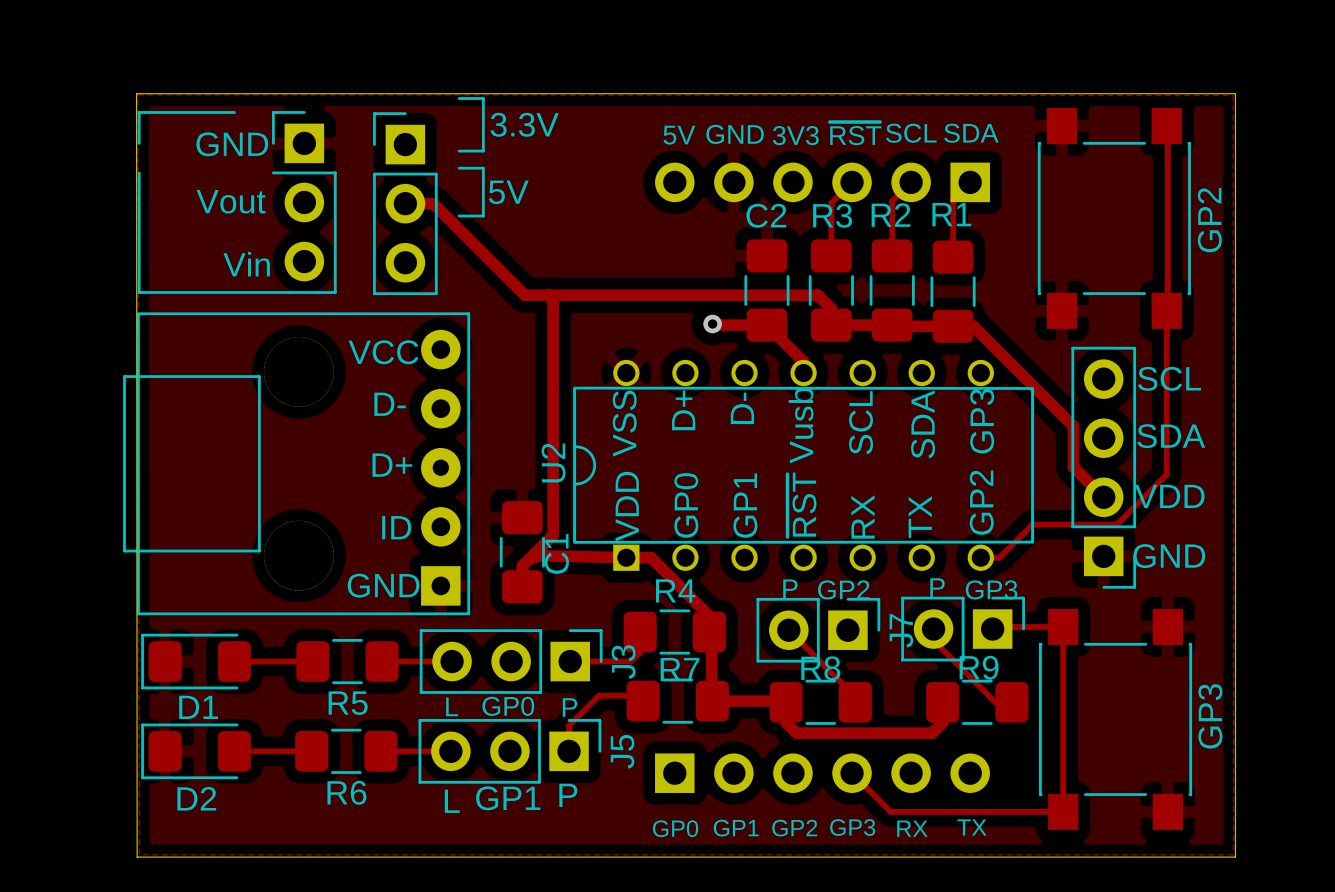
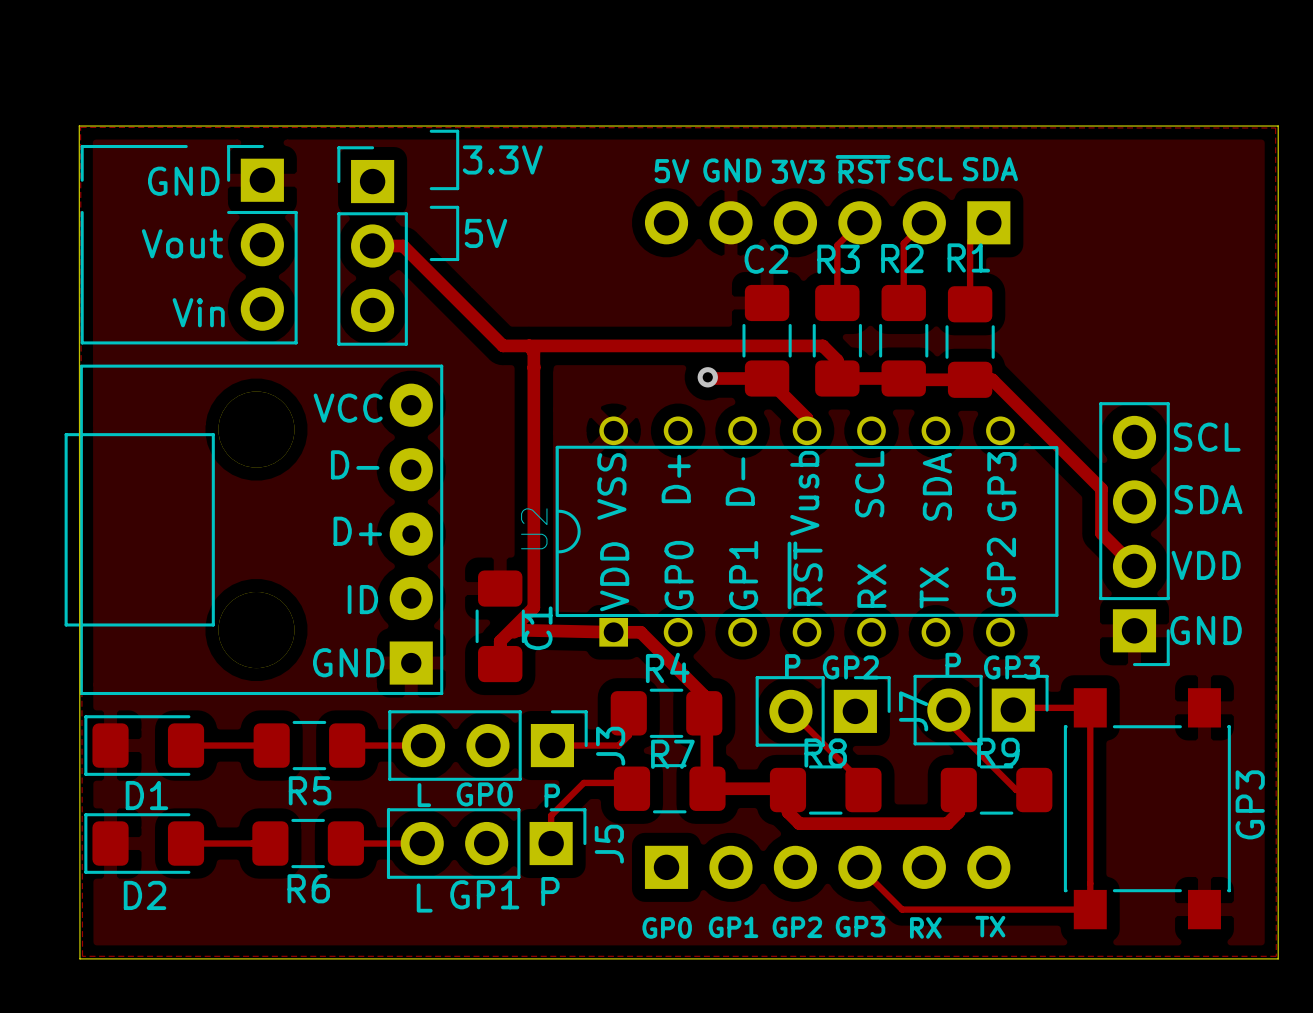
track: (1167, 130) (1167, 315) -> none
part: (1114, 218) -> none
text: GP2 (1209, 220) -> none
track: (1166, 310) (1166, 474) (1116, 524) (1032, 524) (999, 557) (980, 557) -> none
GP3 name: none -> GP3 (1250, 804)
text: GP3 (1210, 716) -> none

